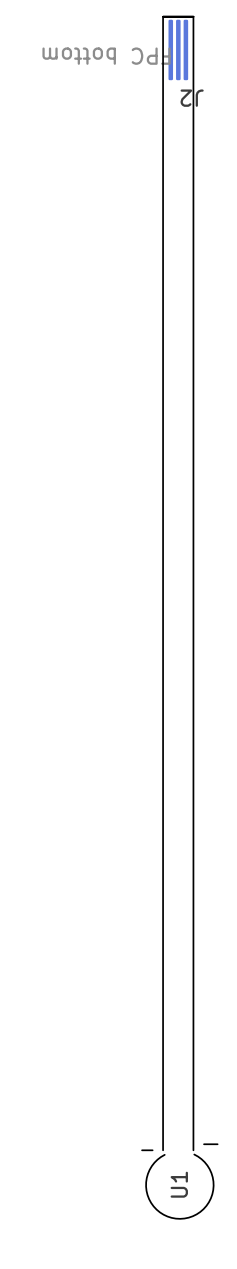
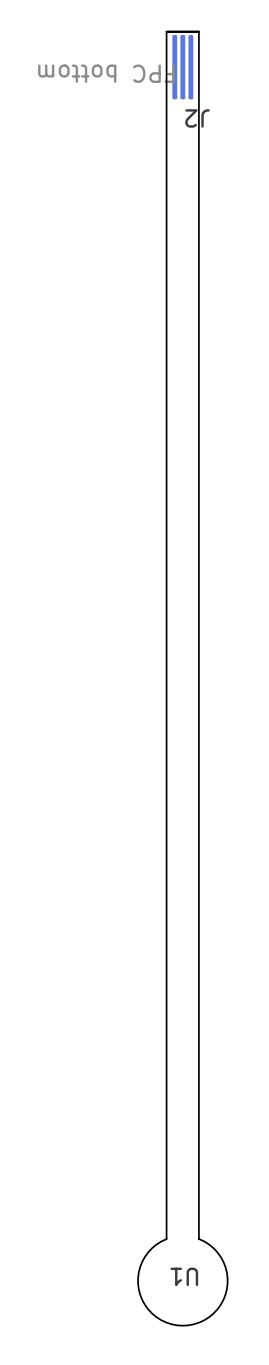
board edge: (217, 1144) (204, 1144) -> none
board edge: (152, 1150) (142, 1150) -> none
board edge: none -> (198, 1239) (213, 1247) (223, 1261) (227, 1277) (226, 1289) (223, 1299) (213, 1313) (199, 1322) (182, 1325) (166, 1322) (156, 1317) (144, 1304) (138, 1289) (138, 1277) (142, 1261) (152, 1248) (166, 1239)
board edge: (194, 1154) (201, 1159) (209, 1169) (213, 1181) (213, 1190) (210, 1198) (203, 1209) (192, 1216) (180, 1218) (167, 1216) (156, 1209) (151, 1202) (146, 1190) (146, 1182) (149, 1169) (157, 1159) (164, 1154) -> none
U1 name rotation: 0° (179, 1184) -> 90° counterclockwise (184, 1276)

